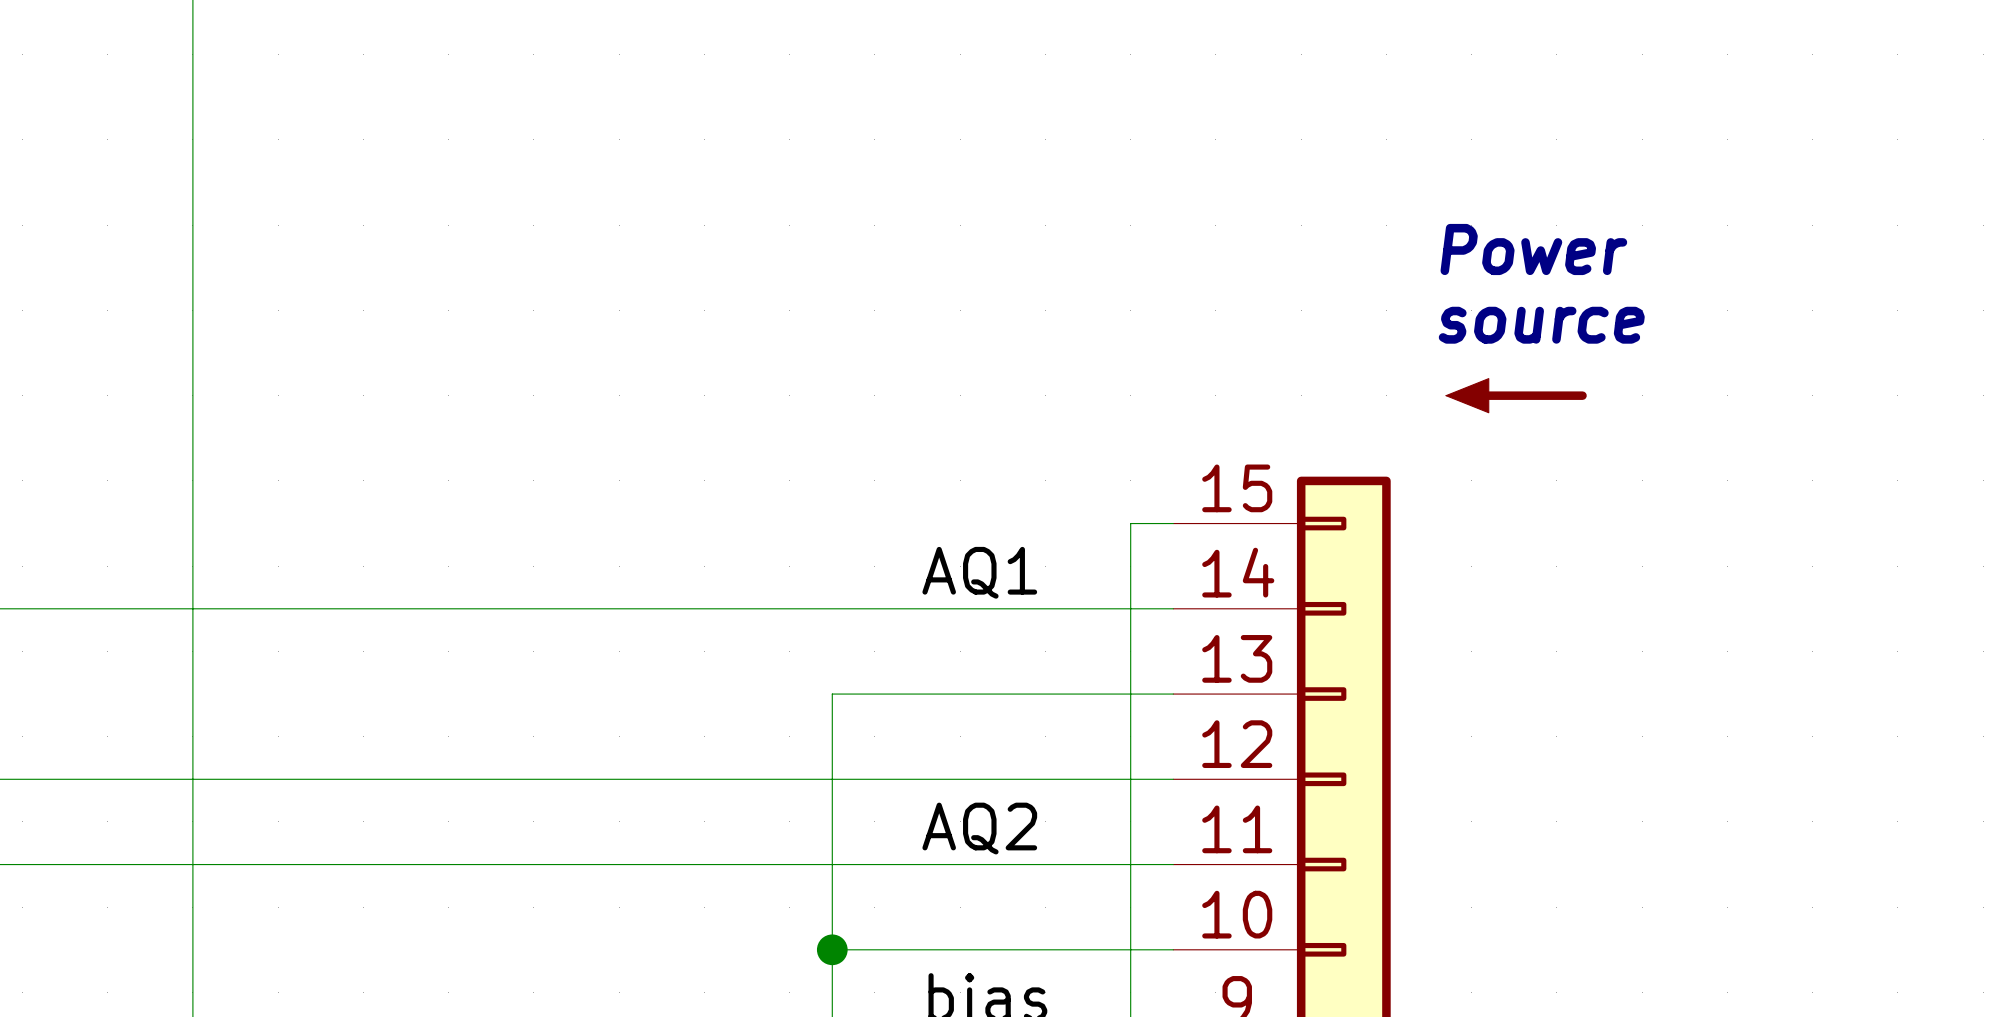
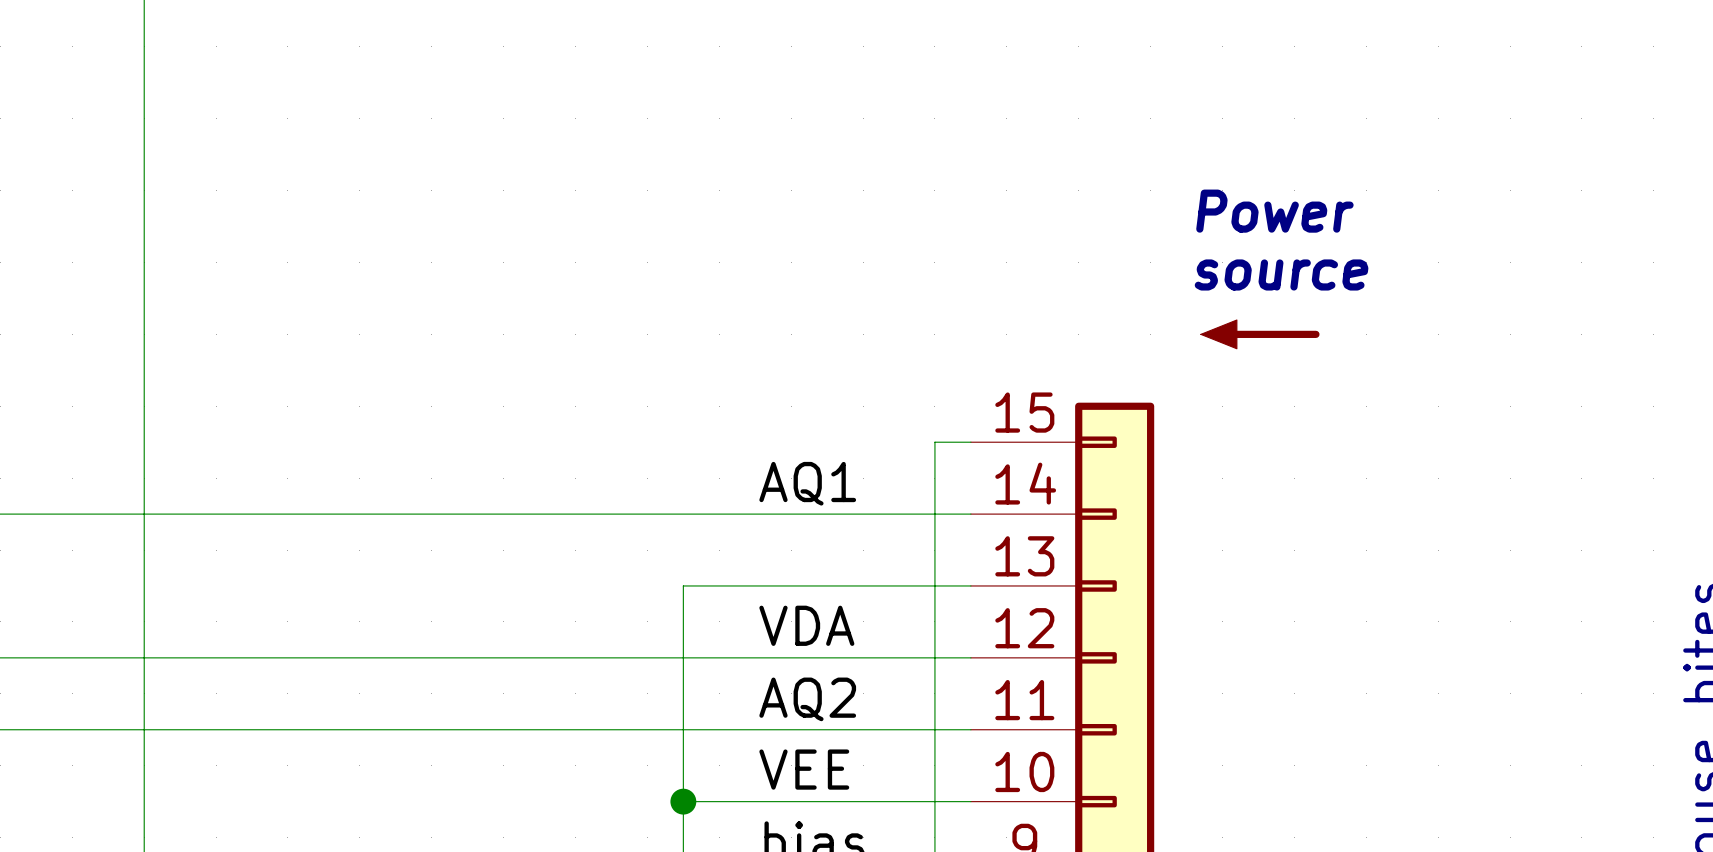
label: none -> VDA (806, 625)
label: none -> VEE (804, 769)

